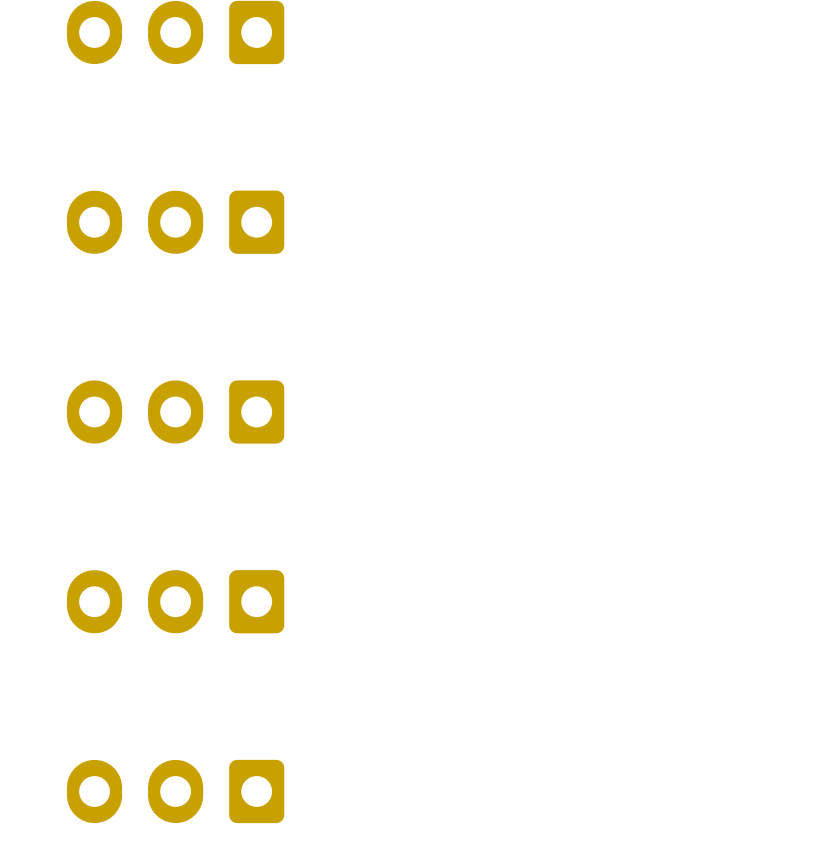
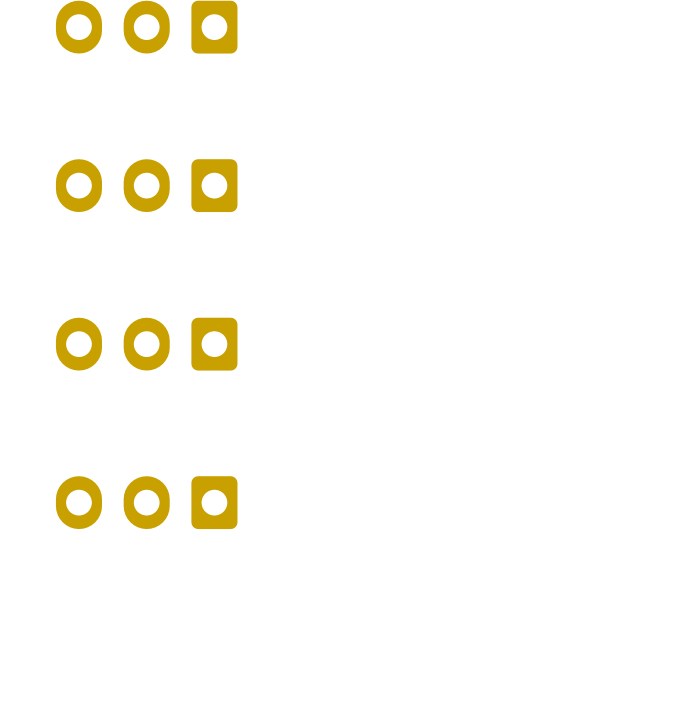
part: (175, 791) -> none

